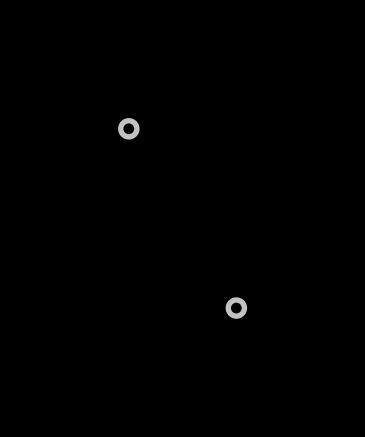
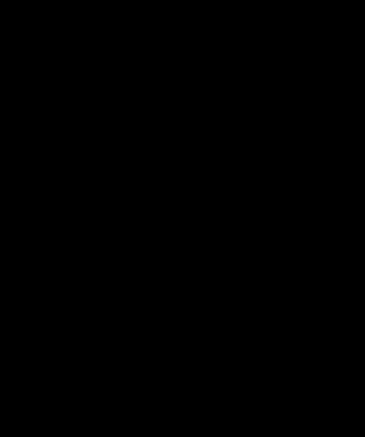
via: (128, 128) -> none
via: (236, 308) -> none

